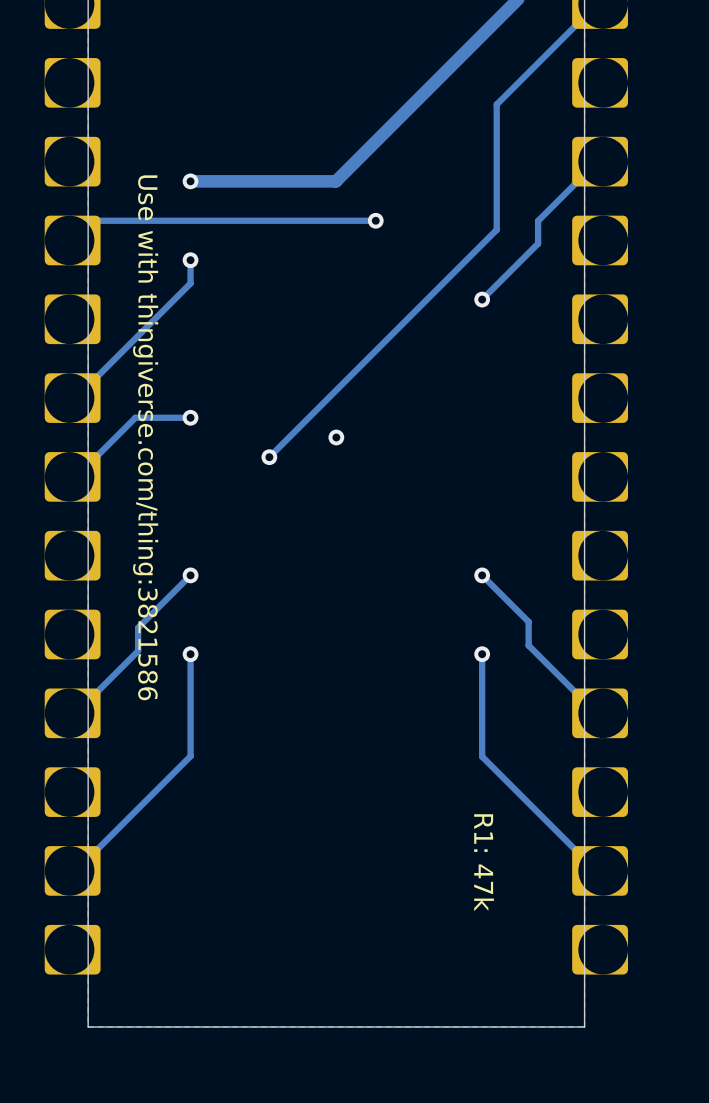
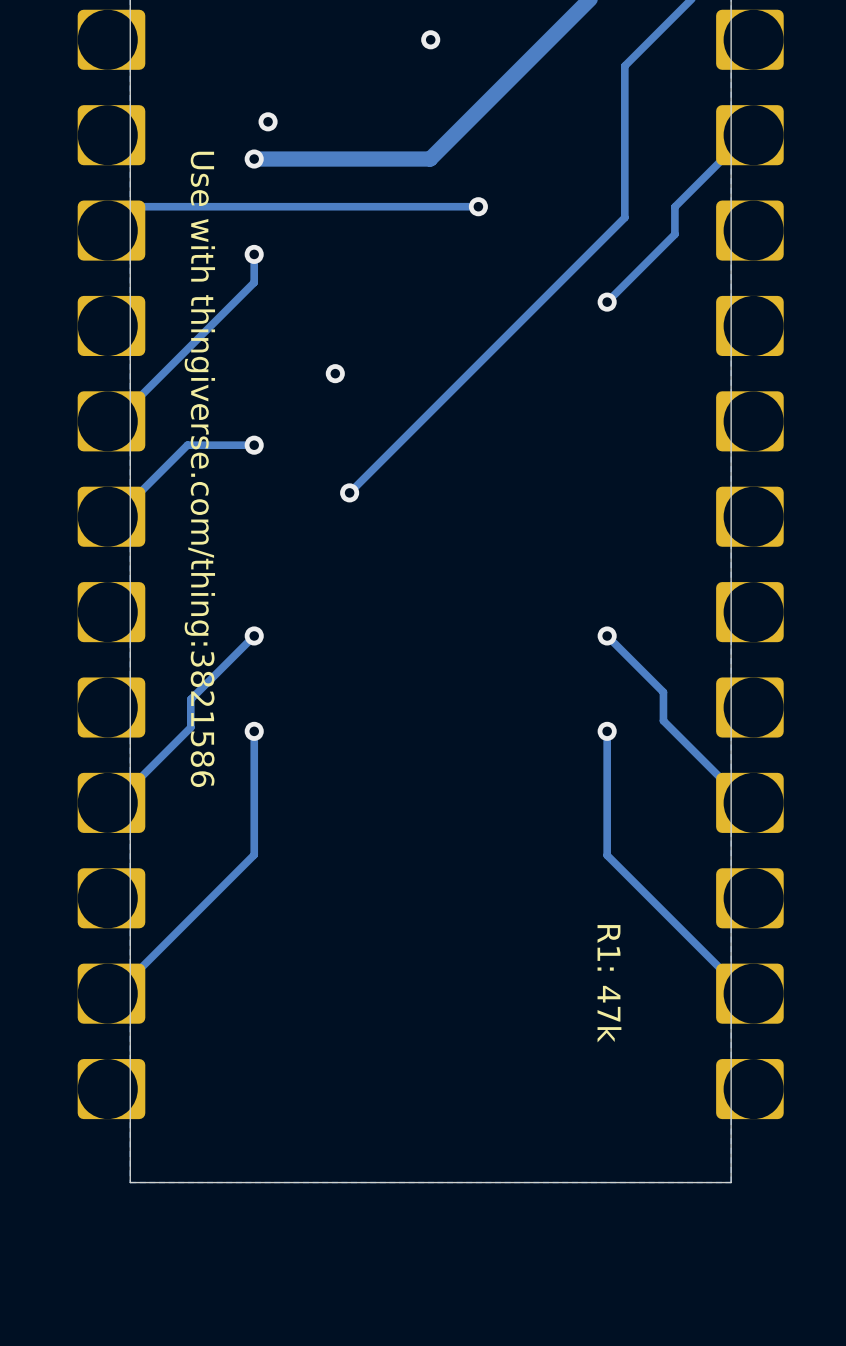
via: none -> (430, 39)
via: none -> (268, 121)
via position: (336, 437) -> (335, 373)

